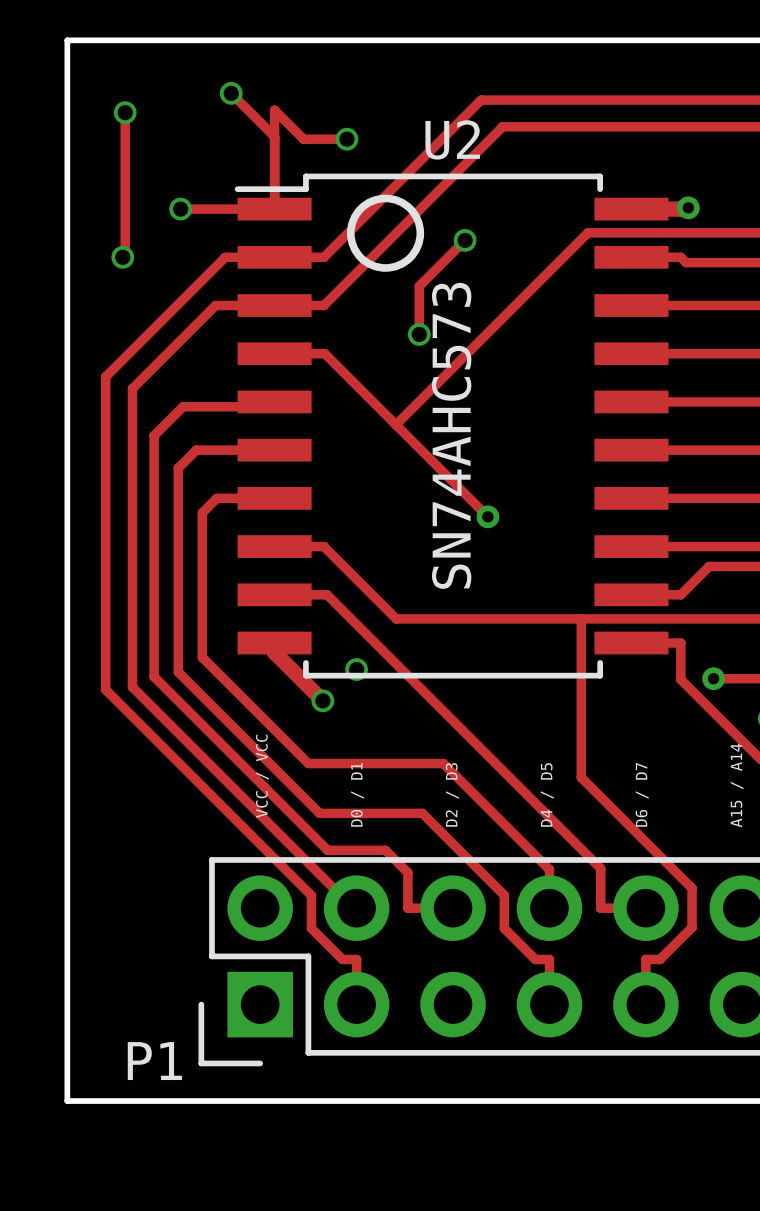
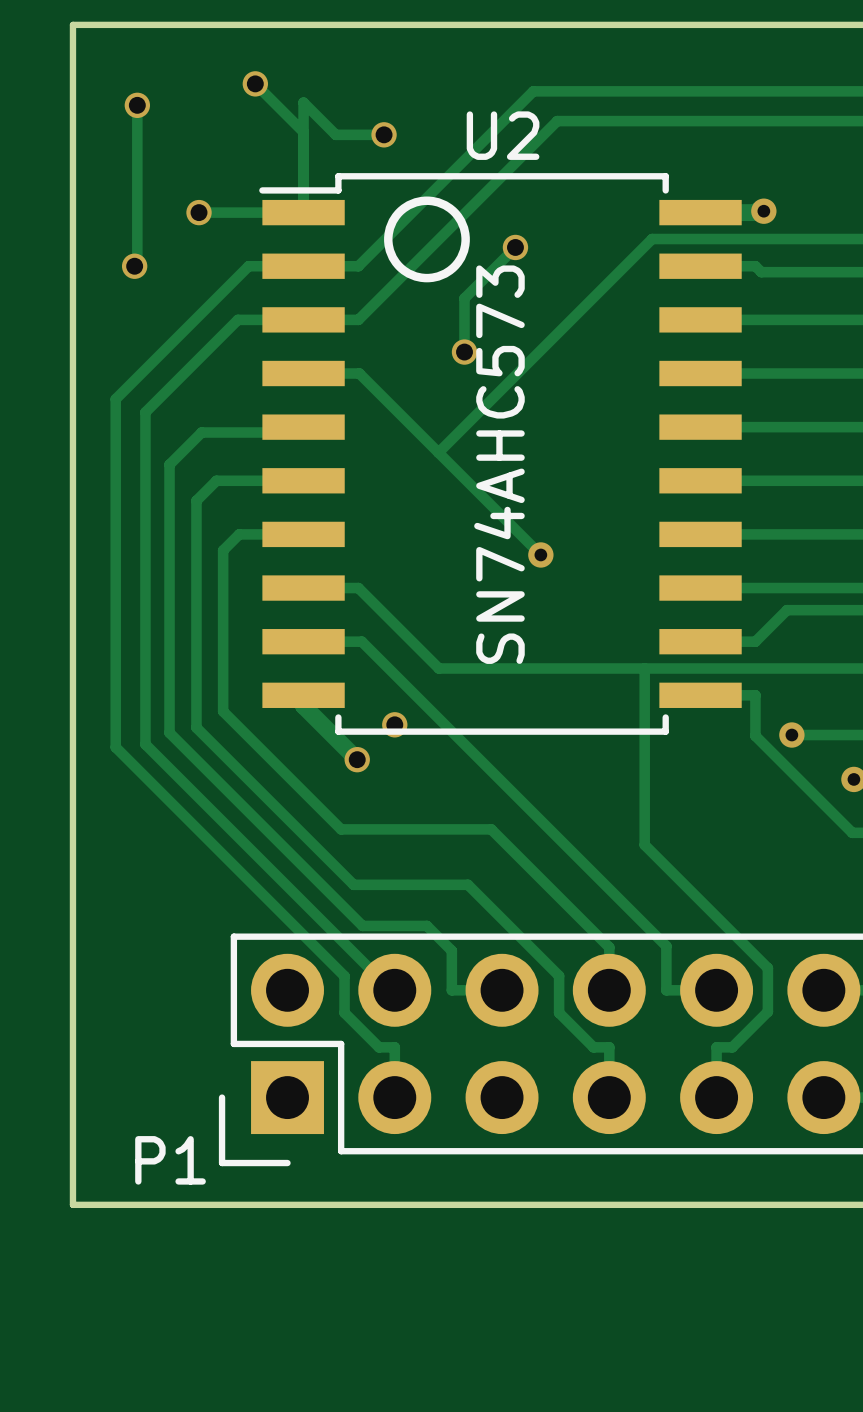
text: VCC / VCC (262, 776) -> none
text: A15 / A14 (737, 785) -> none
text: D0 / D1 (357, 794) -> none
text: D2 / D3 (452, 794) -> none
text: D4 / D5 (547, 794) -> none
text: D6 / D7 (642, 794) -> none

